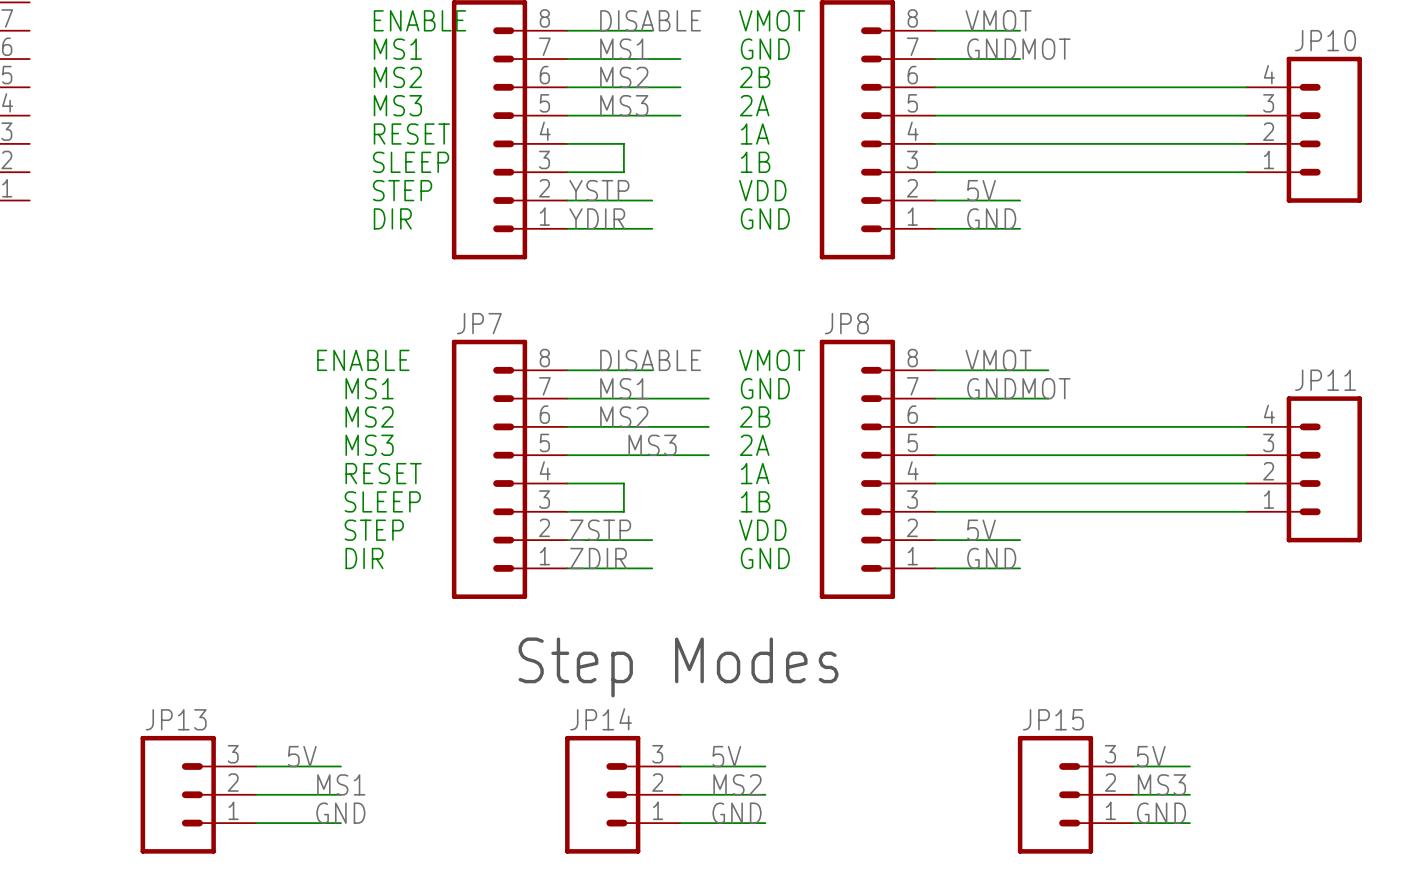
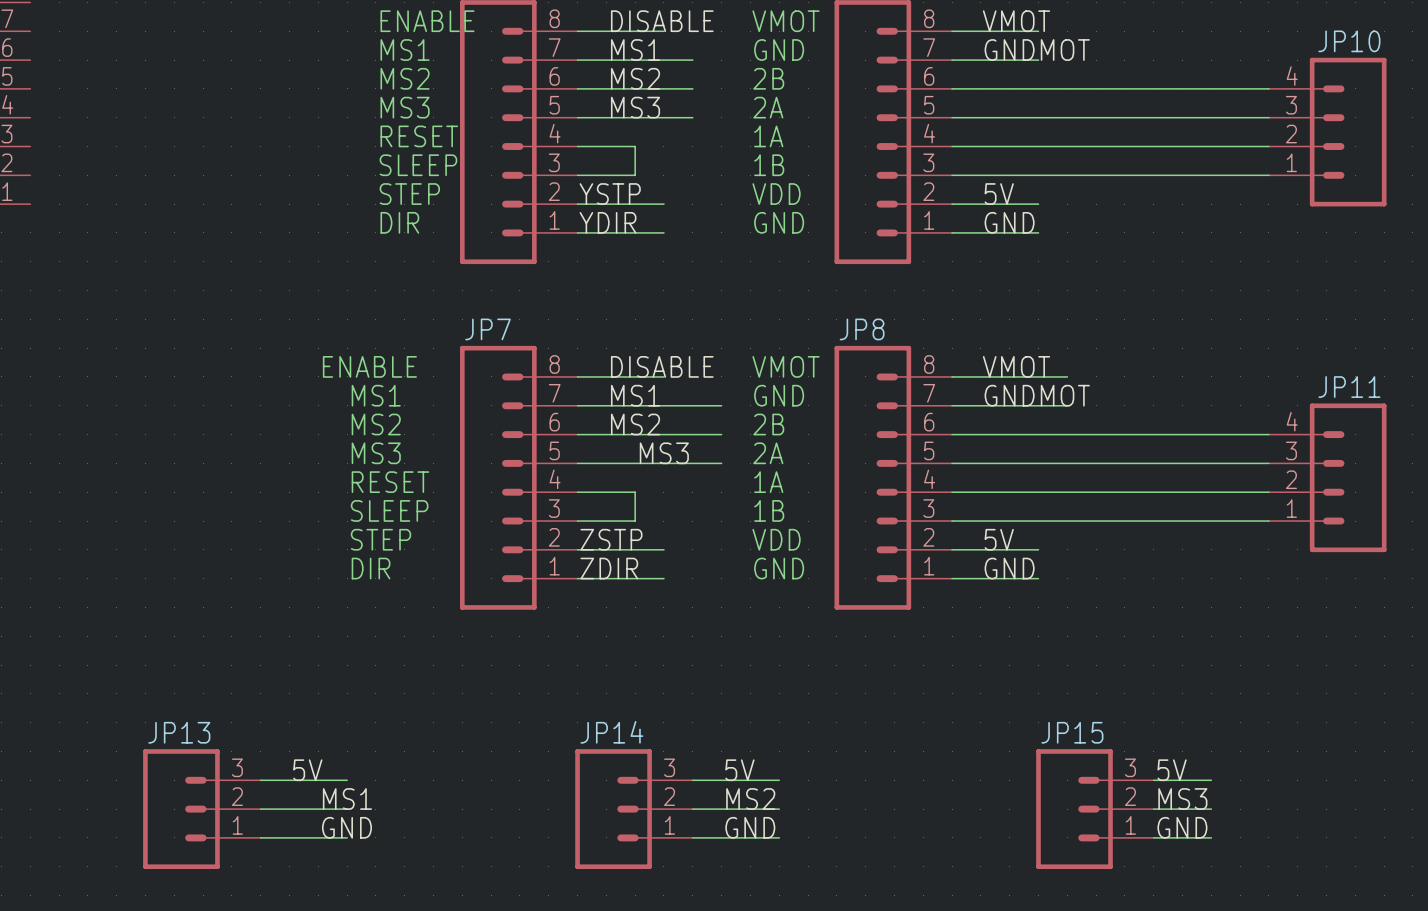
text: Step Modes (678, 667) -> none

